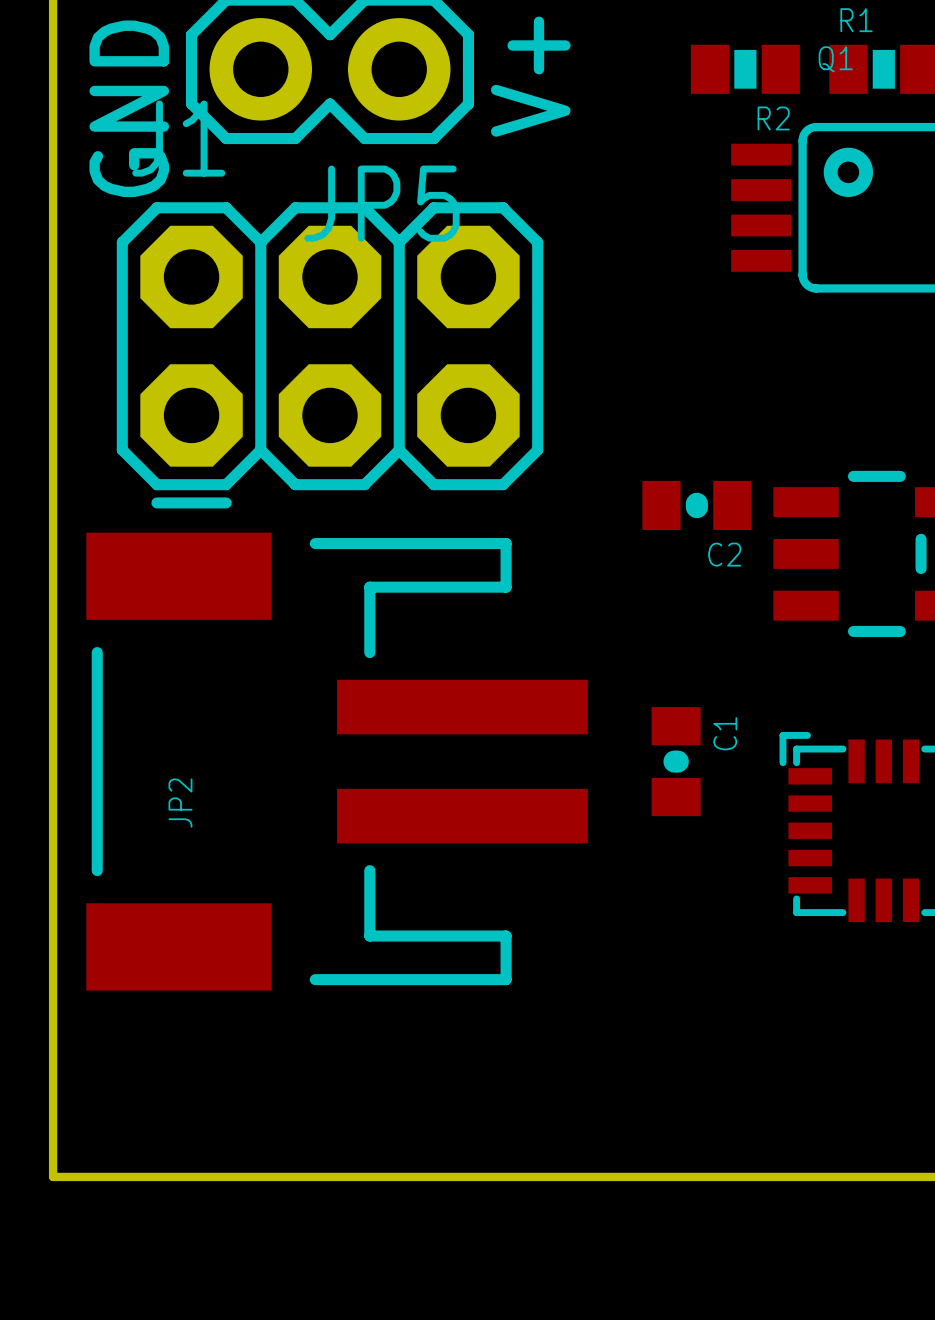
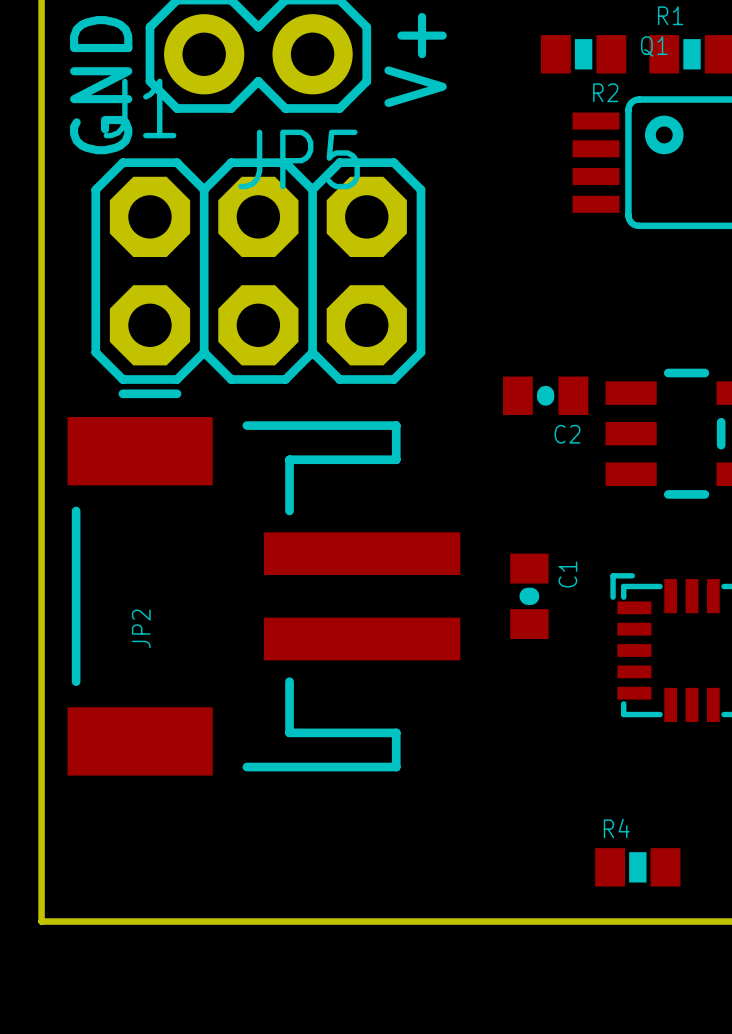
R4: none -> (637, 867)

